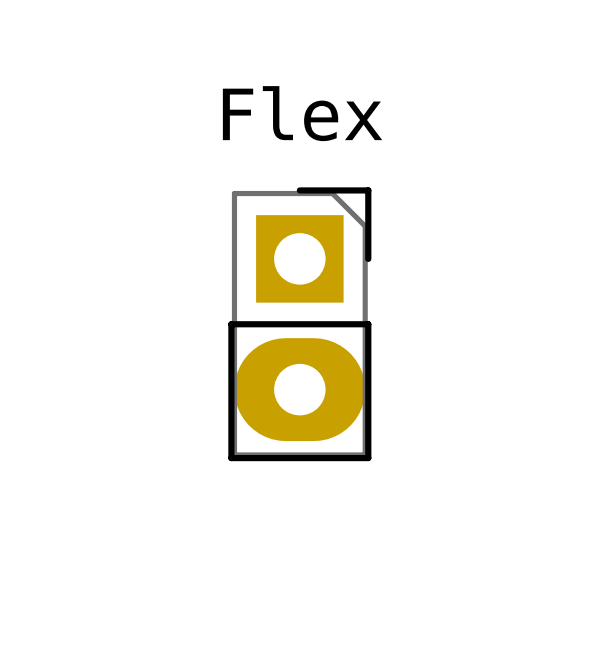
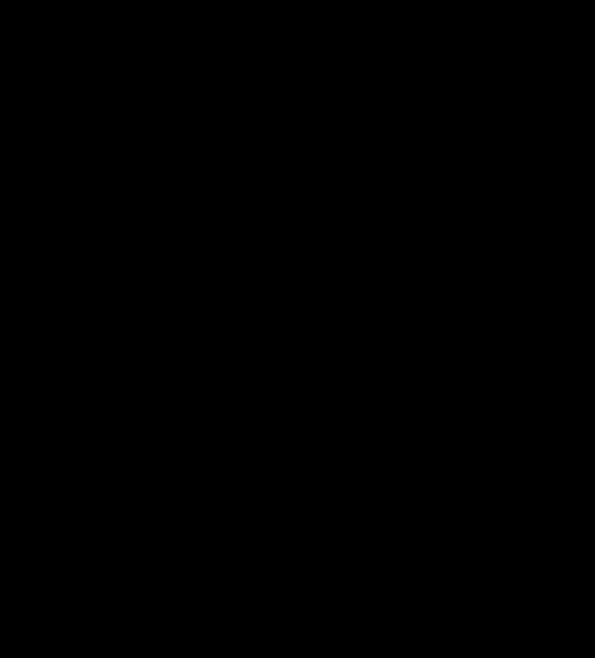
Flex: (299, 324) -> none

